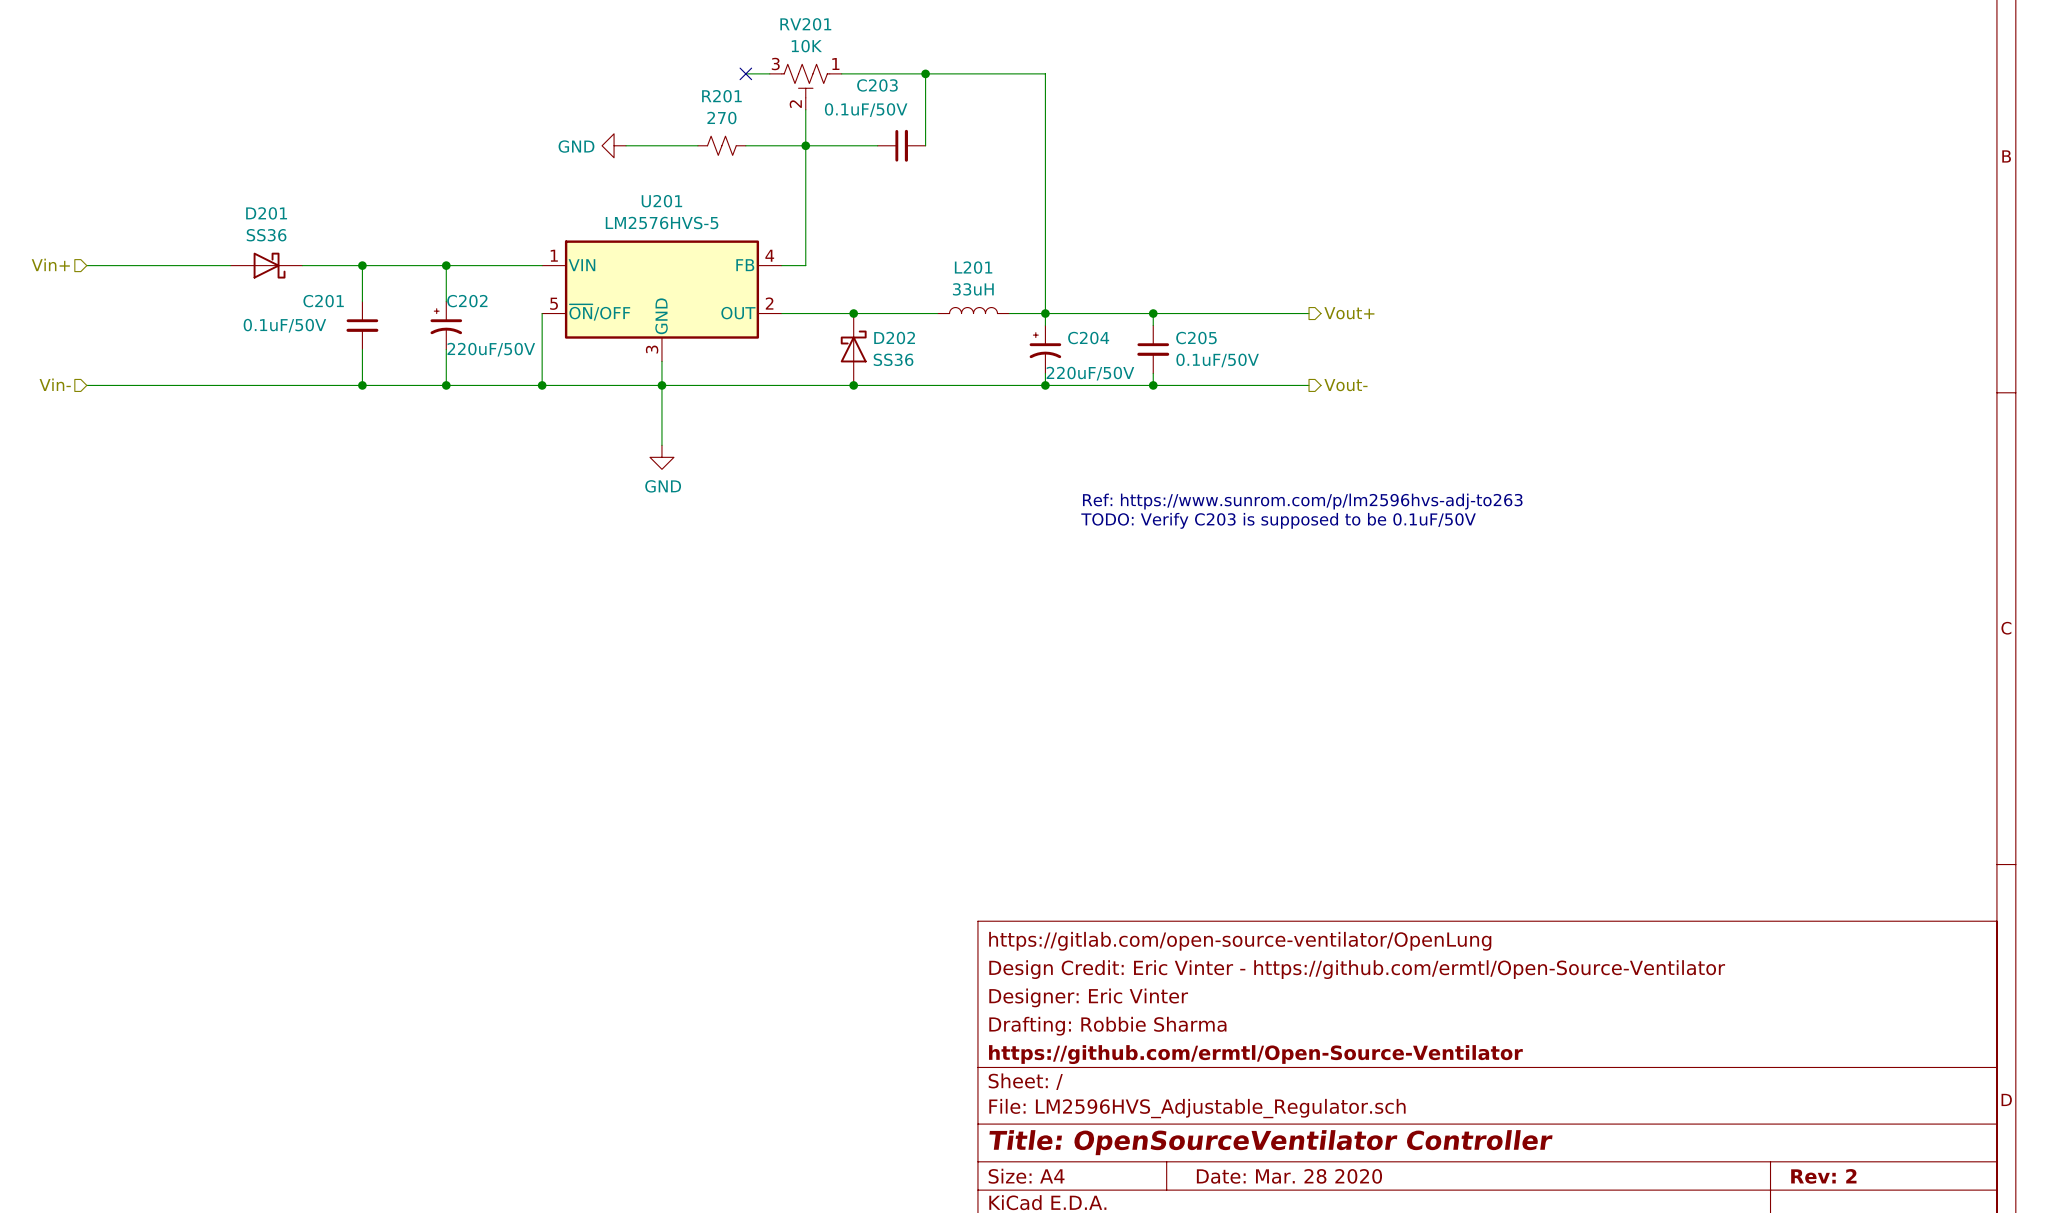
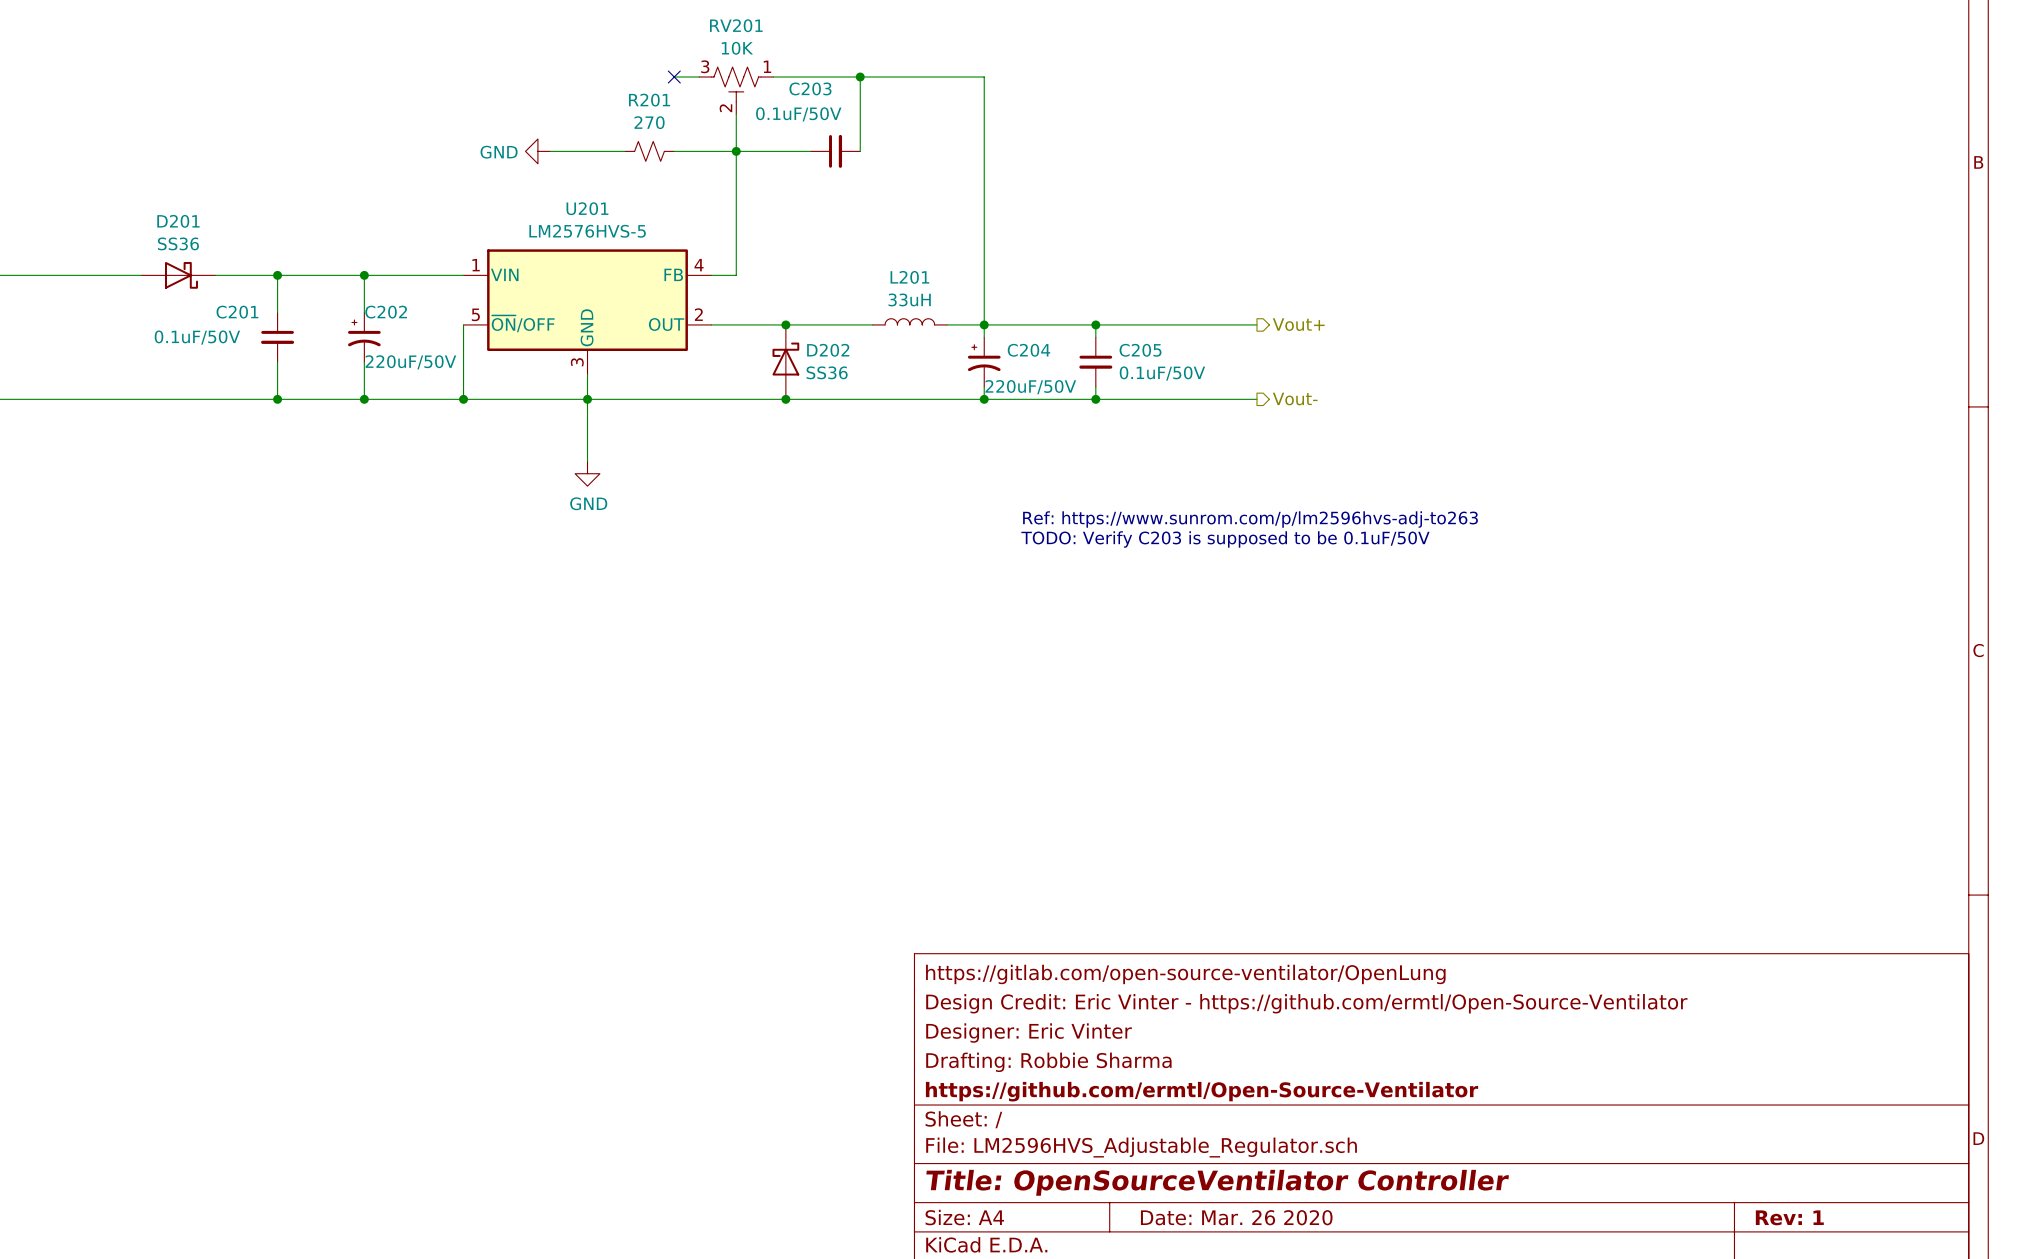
title block: Date: Mar. 28 2020 (1289, 1176) -> Date: Mar. 26 2020 (1236, 1217)
title block: Rev: 2 (1823, 1176) -> Rev: 1 (1789, 1217)

